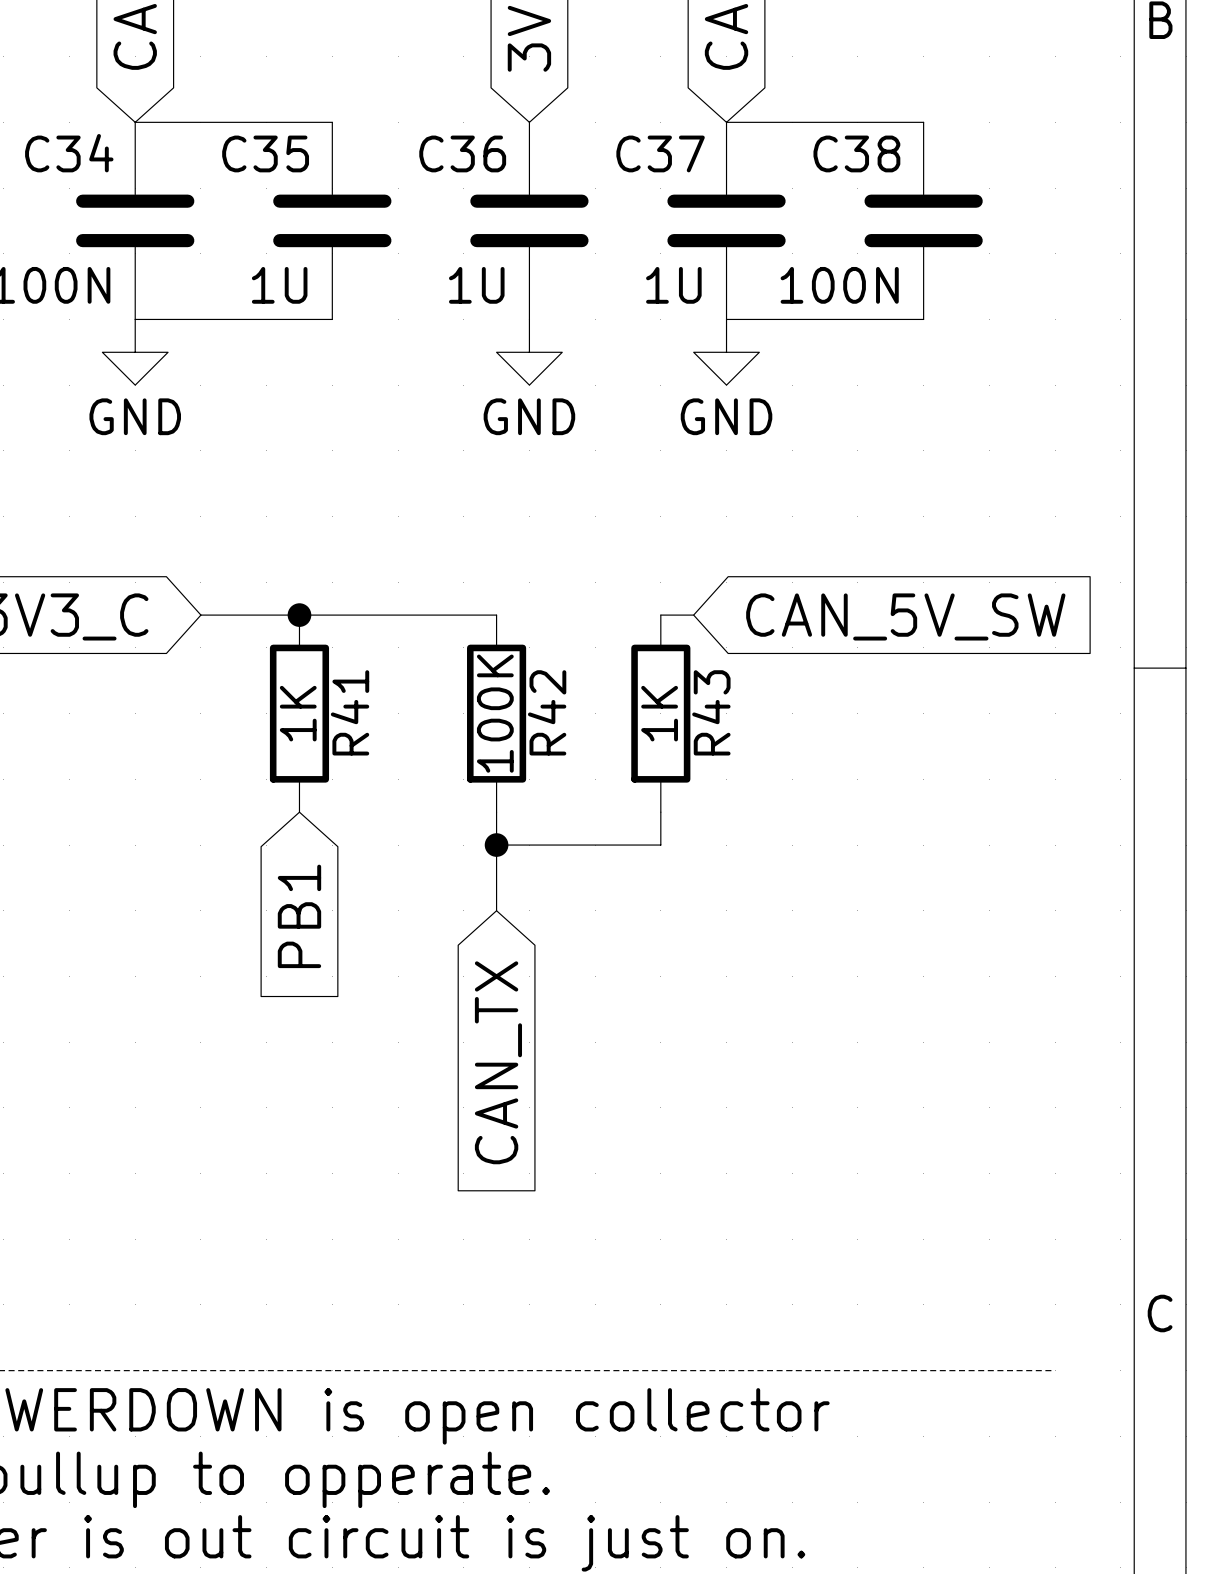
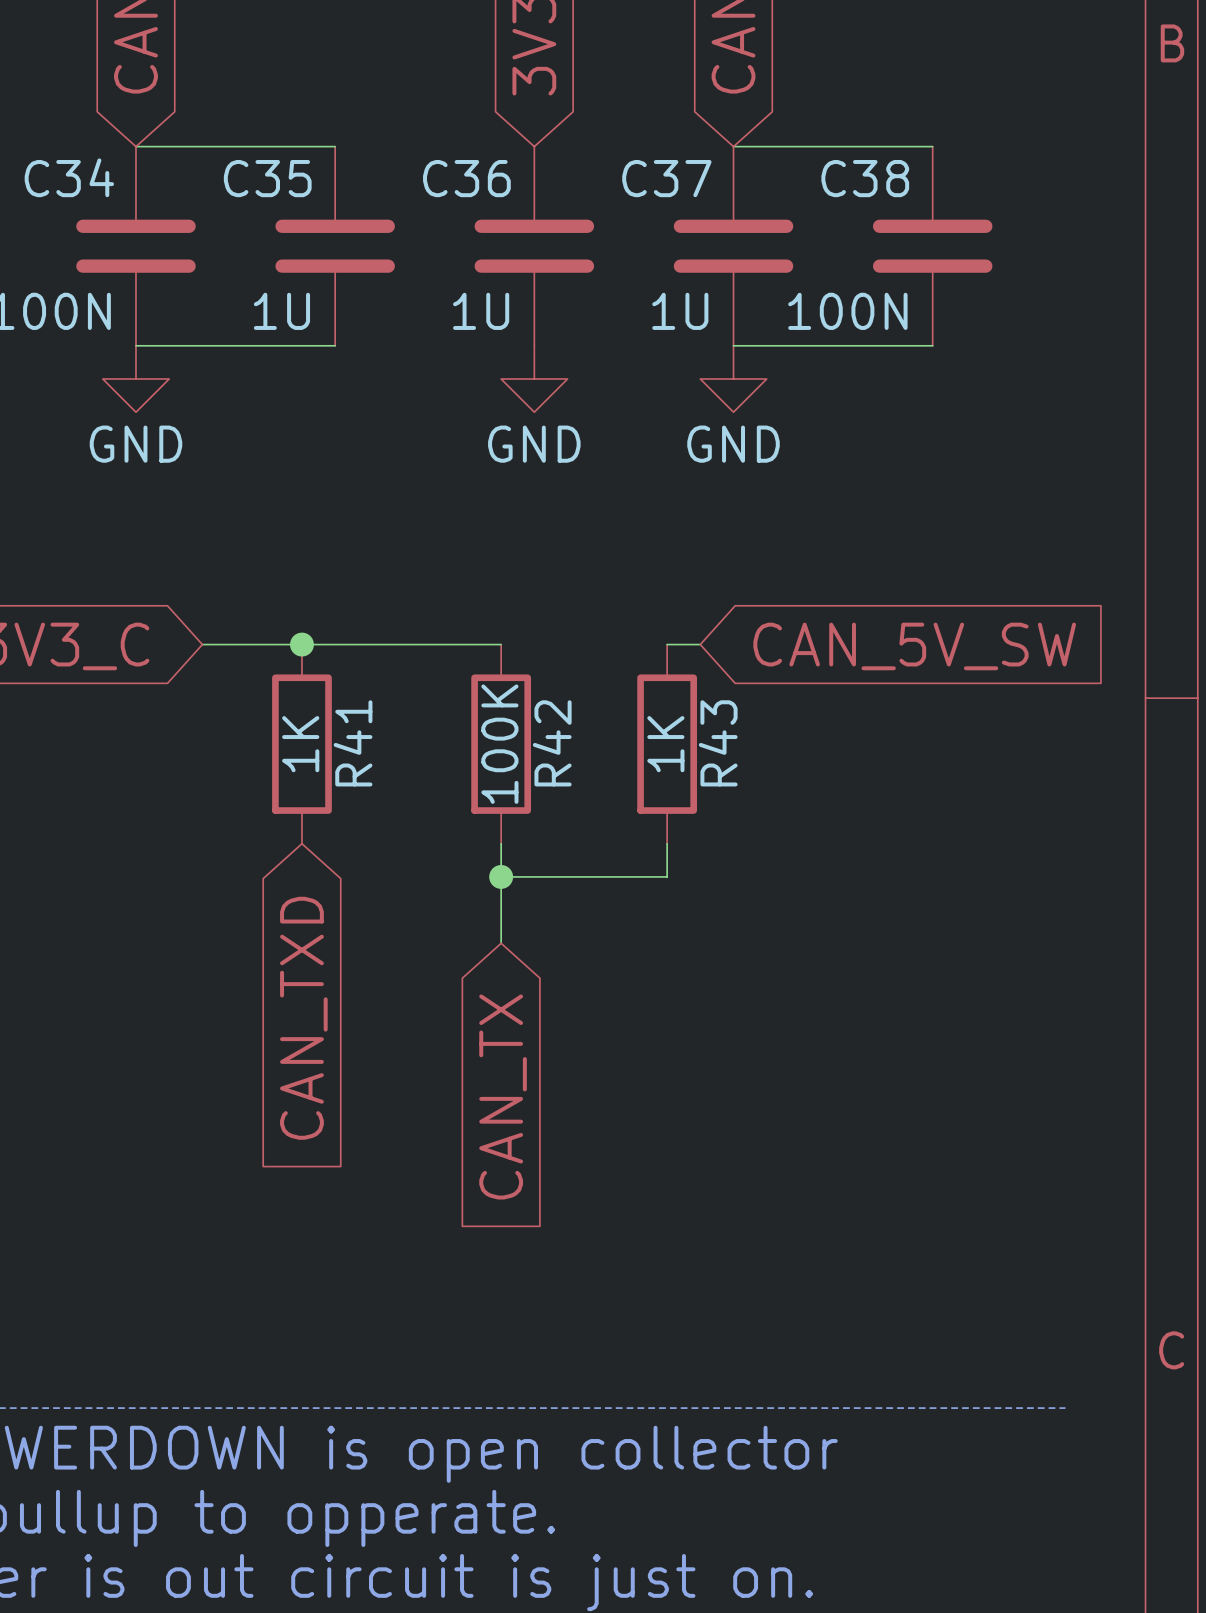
global label: PB1 (299, 916) -> CAN_TXD (303, 1018)

